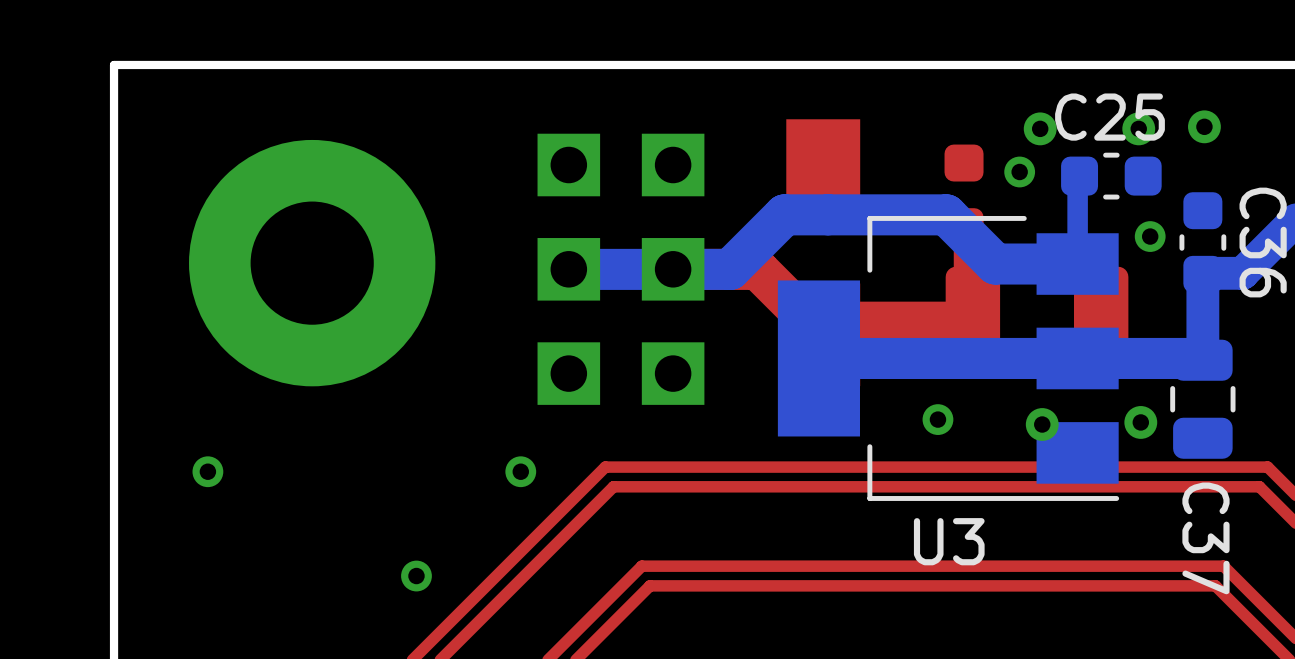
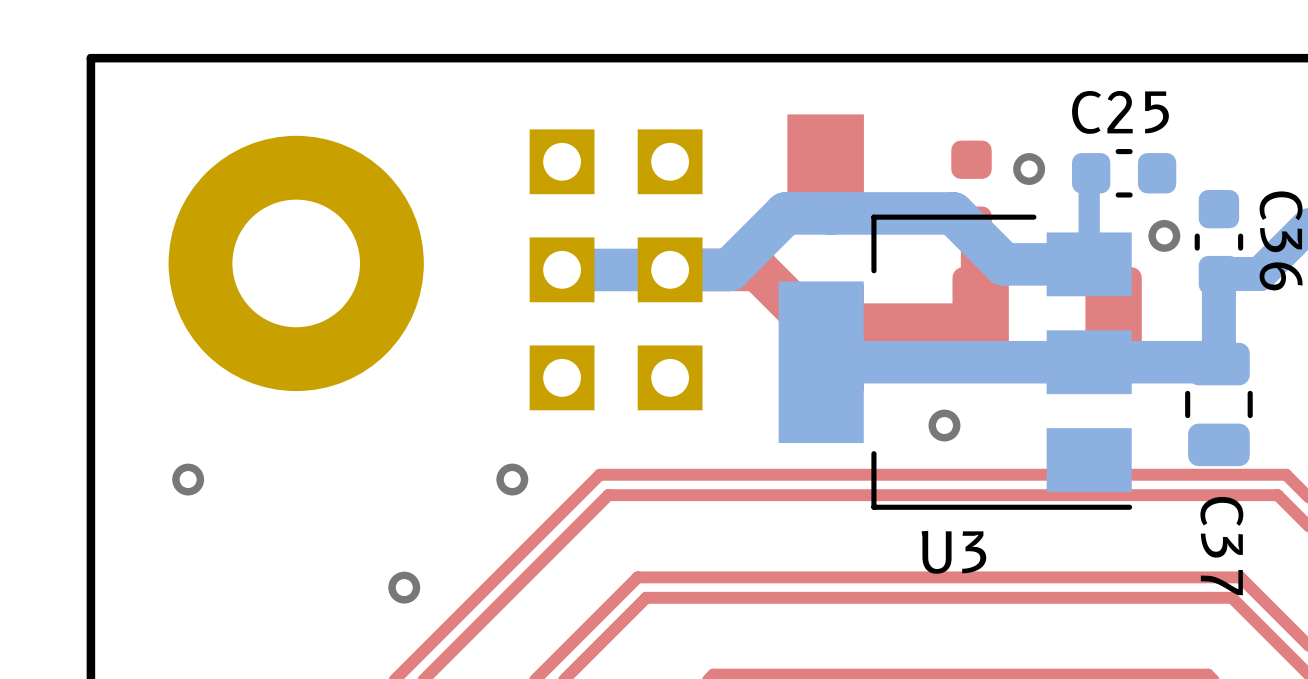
via: (1204, 126) -> none
via: (1040, 128) -> none
via: (1138, 128) -> none
via: (1140, 422) -> none
via: (1042, 424) -> none

